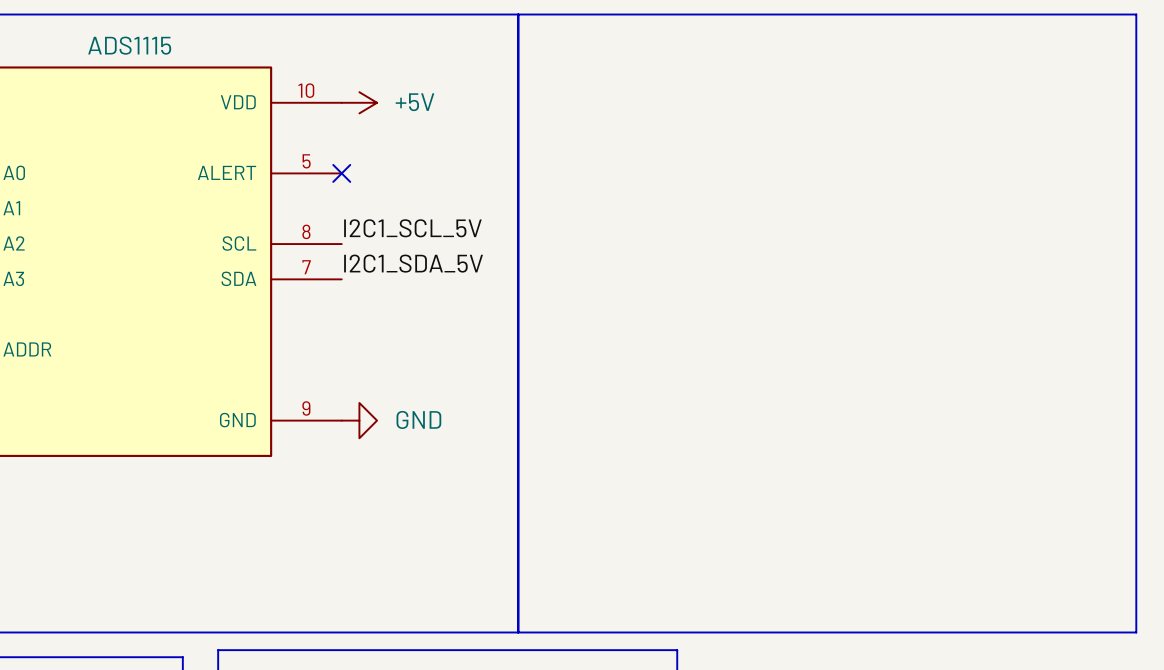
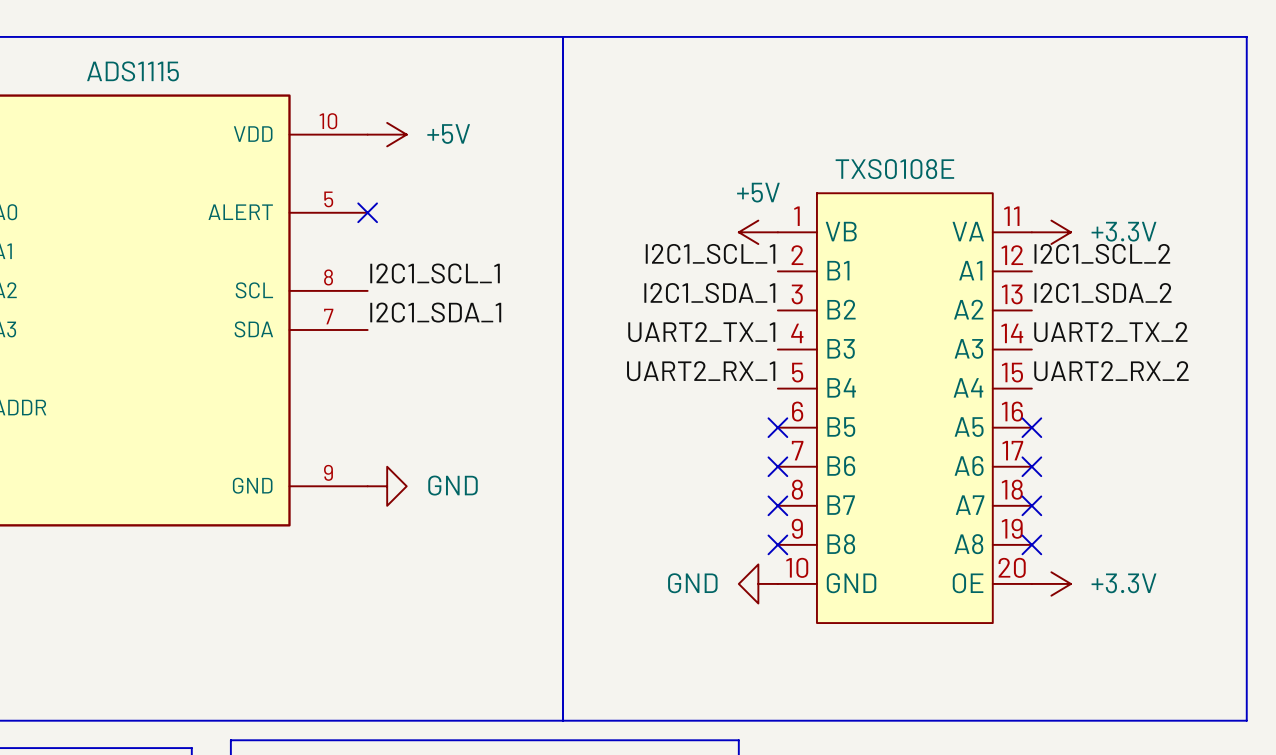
power symbol: none -> +5V (758, 232)
power symbol: none -> +3.3V (1051, 232)
label: none -> I2C1_SCL_1 (710, 253)
label: none -> I2C1_SCL_2 (1102, 253)
label: I2C1_SCL_5V (412, 228) -> I2C1_SCL_1 (435, 273)
label: none -> I2C1_SDA_1 (709, 293)
label: none -> I2C1_SDA_2 (1103, 293)
label: I2C1_SDA_5V (413, 263) -> I2C1_SDA_1 (435, 312)
label: none -> UART2_TX_1 (701, 332)
label: none -> UART2_TX_2 (1110, 332)
label: none -> UART2_RX_1 (701, 371)
label: none -> UART2_RX_2 (1111, 371)
part: none -> TXS0108E (904, 408)
no-connect mark: none -> (777, 427)
no-connect mark: none -> (1031, 427)
no-connect mark: none -> (777, 466)
no-connect mark: none -> (1031, 466)
no-connect mark: none -> (777, 505)
no-connect mark: none -> (1031, 505)
no-connect mark: none -> (777, 544)
no-connect mark: none -> (1031, 544)
power symbol: none -> GND (758, 583)
power symbol: none -> +3.3V (1051, 583)

